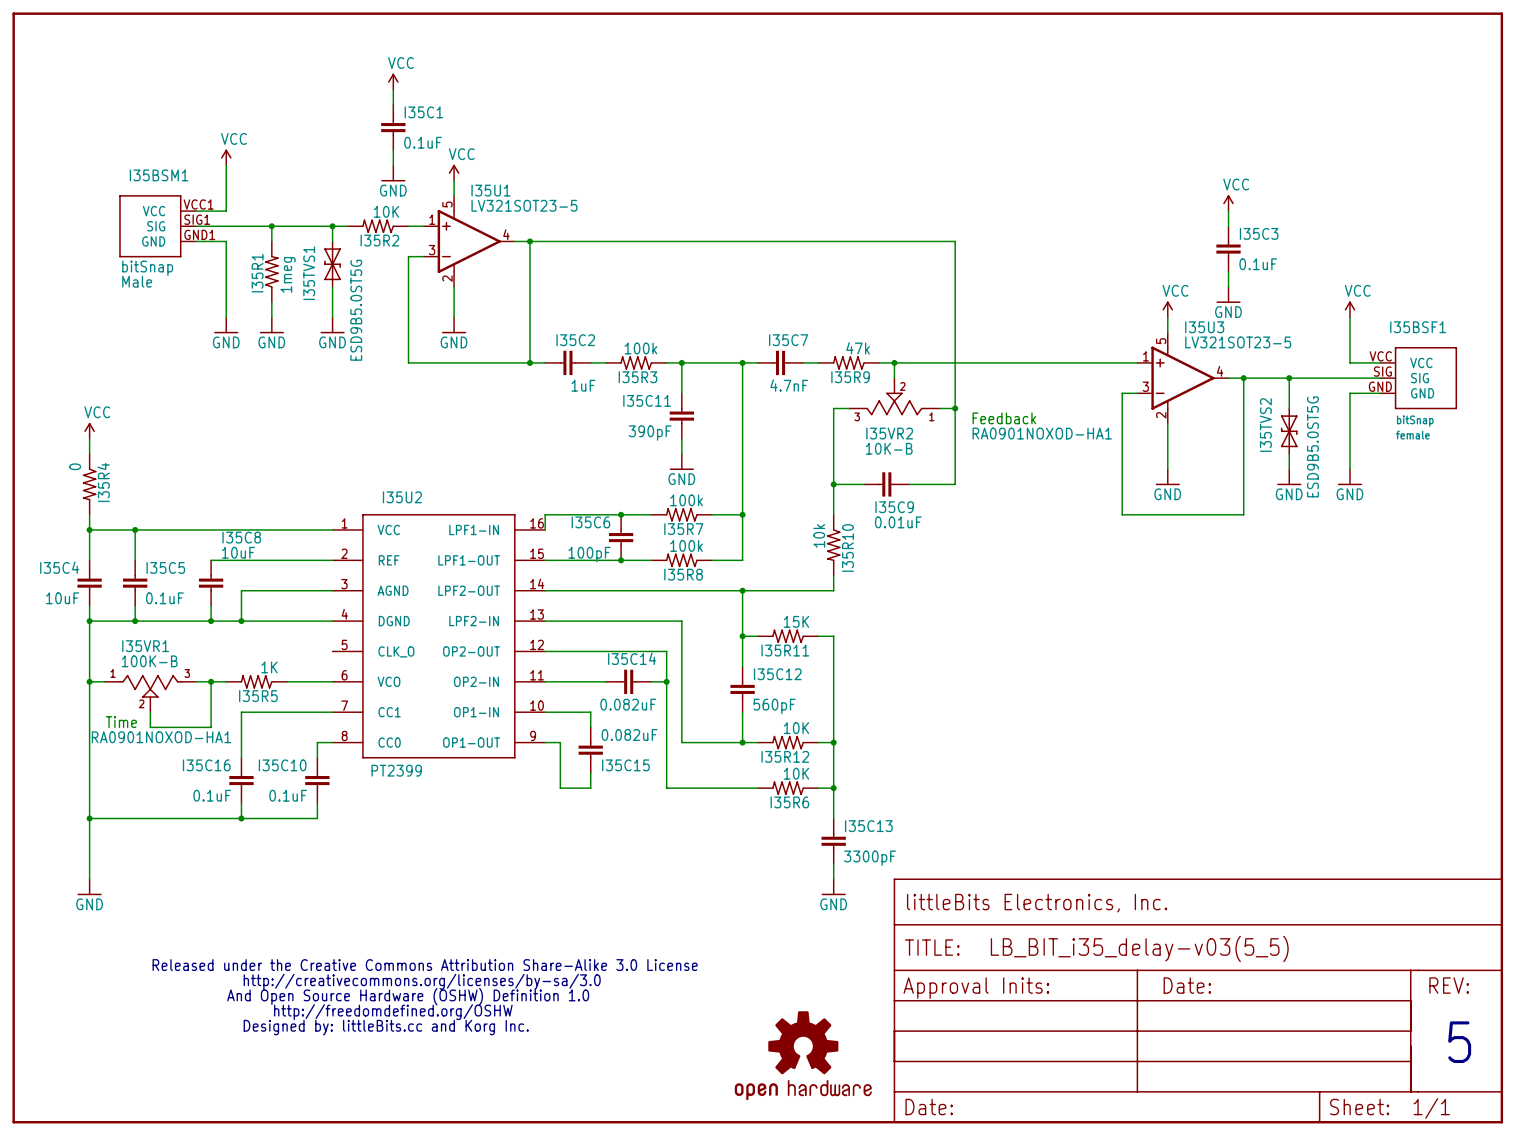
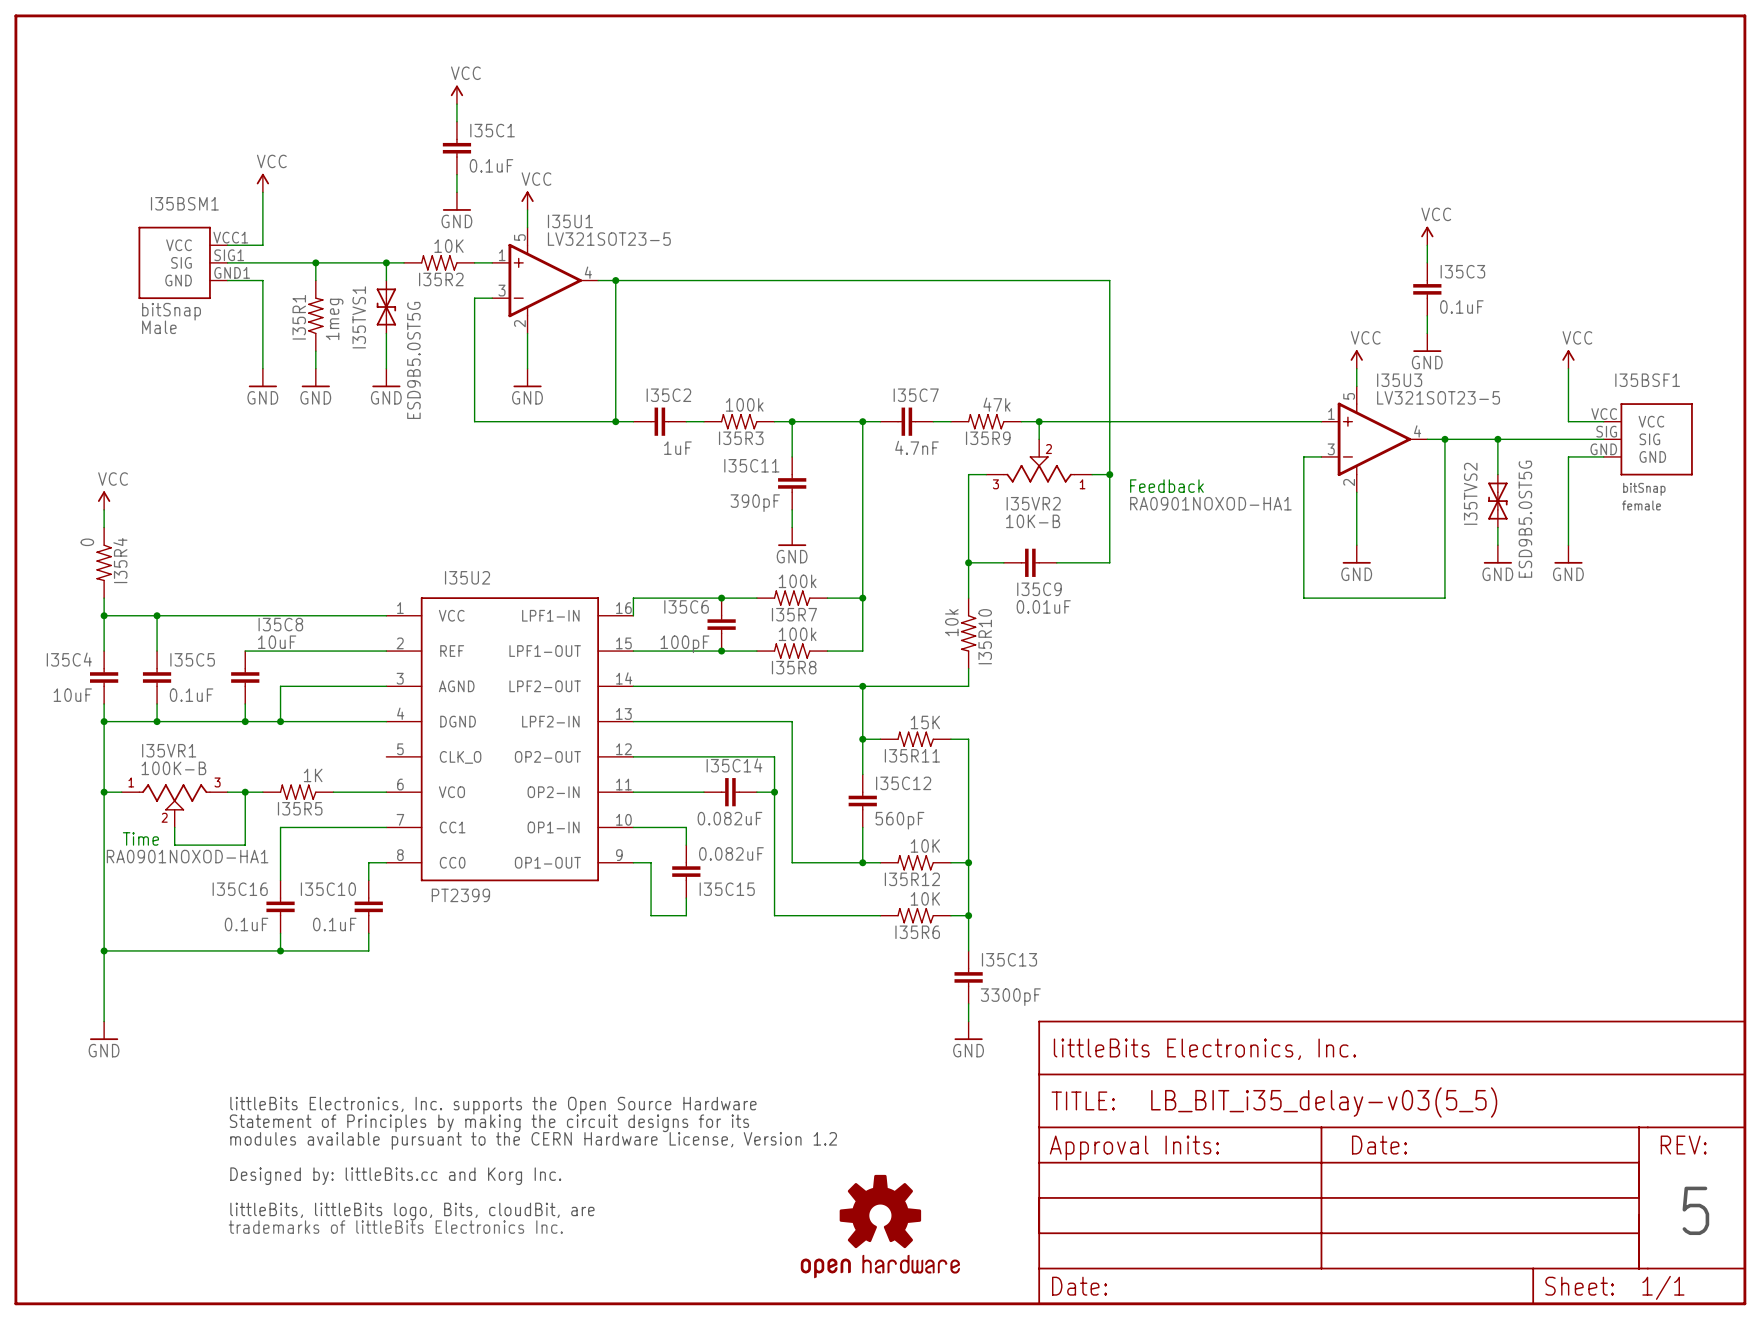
part: (425, 997) -> none
part: none -> (532, 1165)
part position: (803, 1055) -> (880, 1226)

